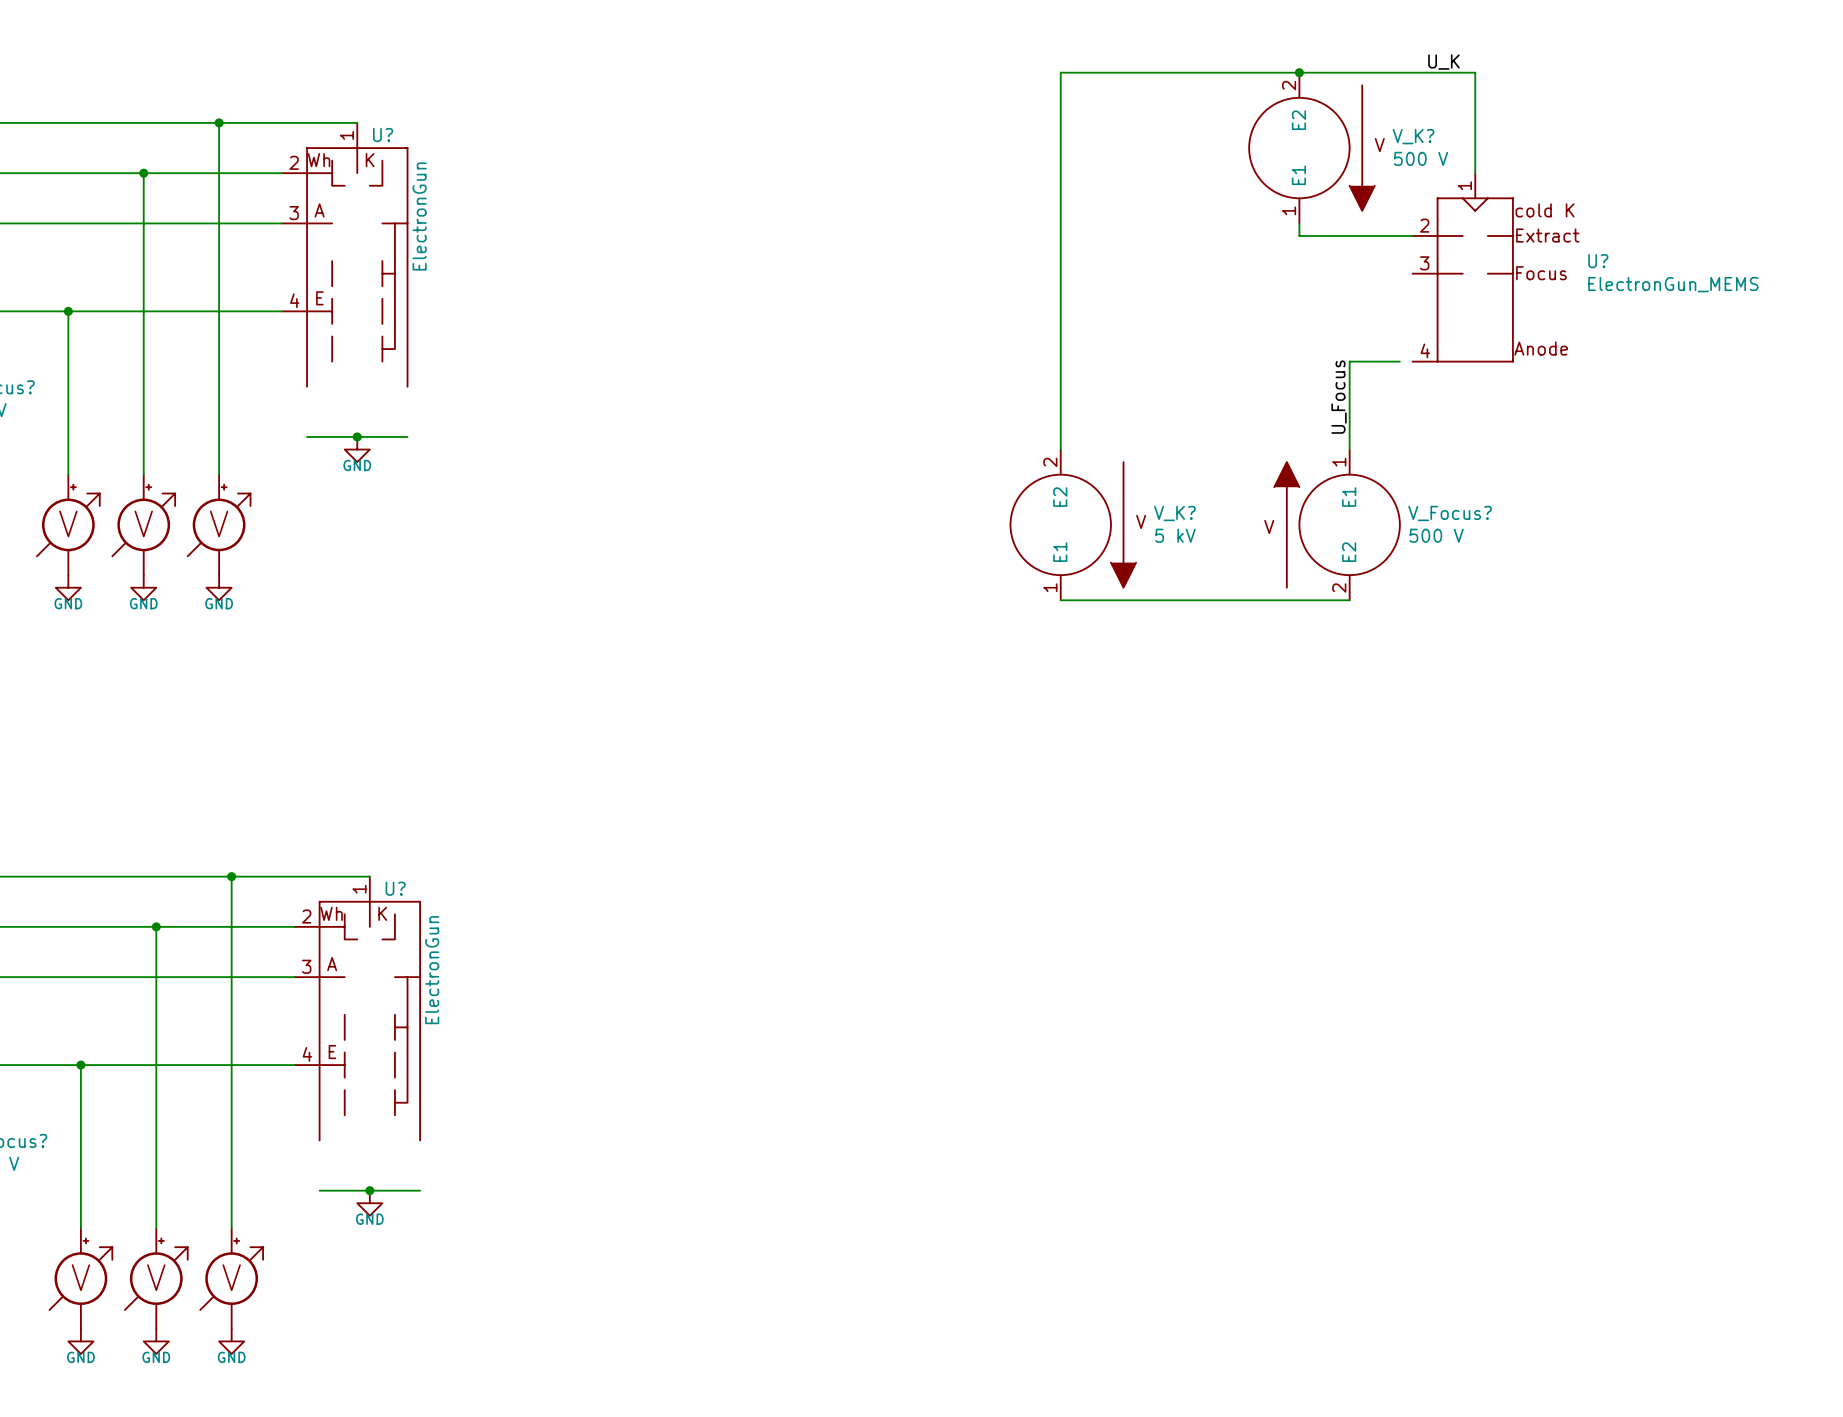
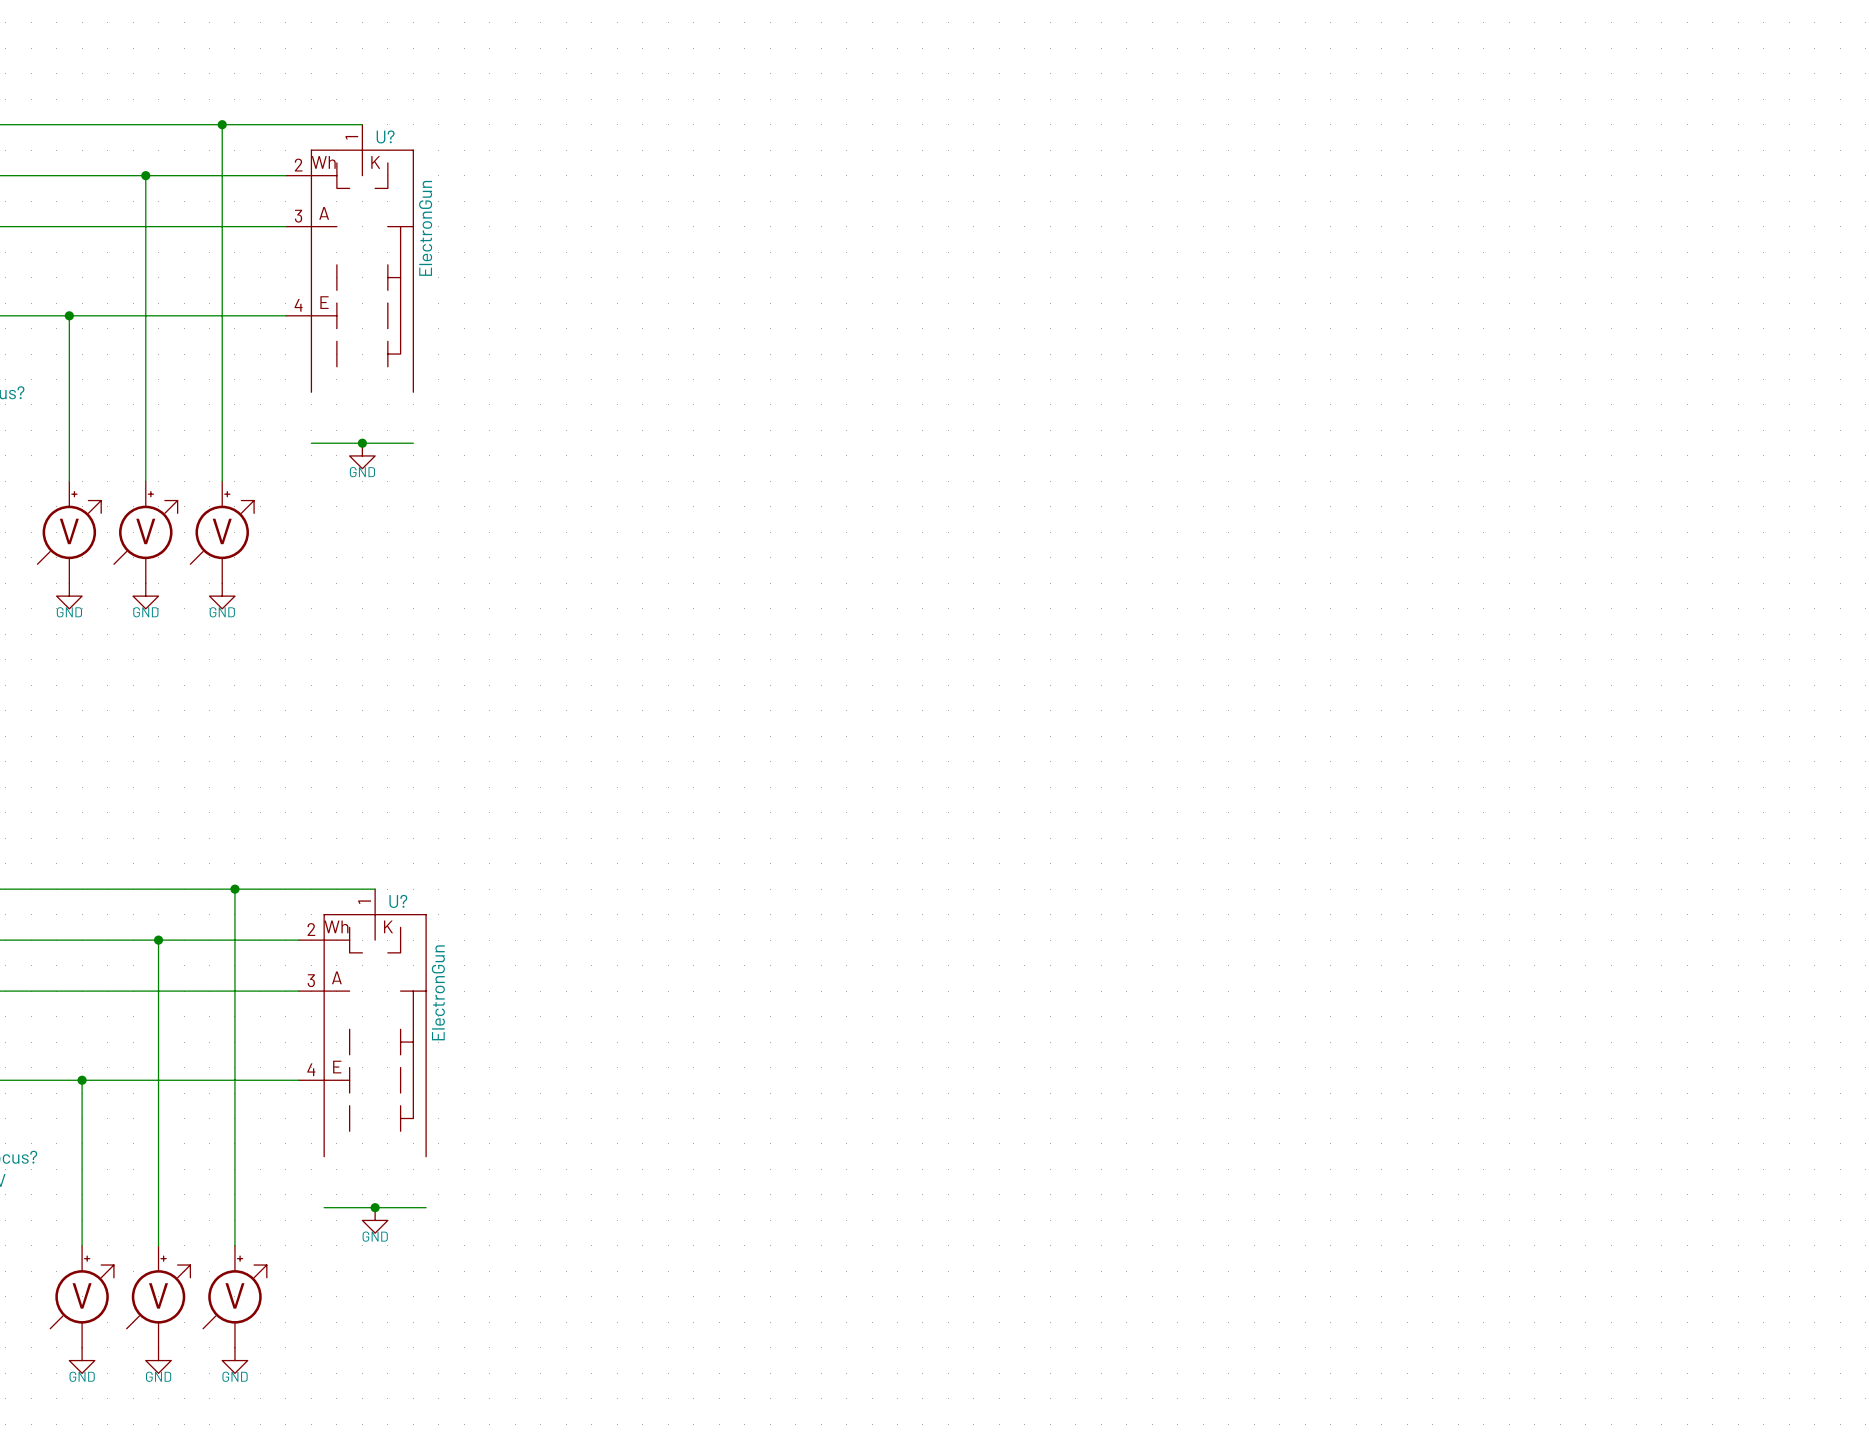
label: U_K (1443, 62) -> none
junction: (1299, 72) -> none
V_K?: 500 V (1311, 148) -> none
wire: (1475, 173) (1475, 72) (1060, 72) (1060, 449) -> none
wire: (1299, 223) (1299, 235) (1412, 235) -> none
U?: ElectronGun_MEMS (1462, 267) -> none
wire: (1399, 361) (1349, 361) (1349, 449) -> none
label: U_Focus (1339, 397) -> none
V_K?: 5 kV (1073, 524) -> none
V_Focus?: 500 V (1337, 524) -> none
wire: (1060, 600) (1349, 600) -> none

